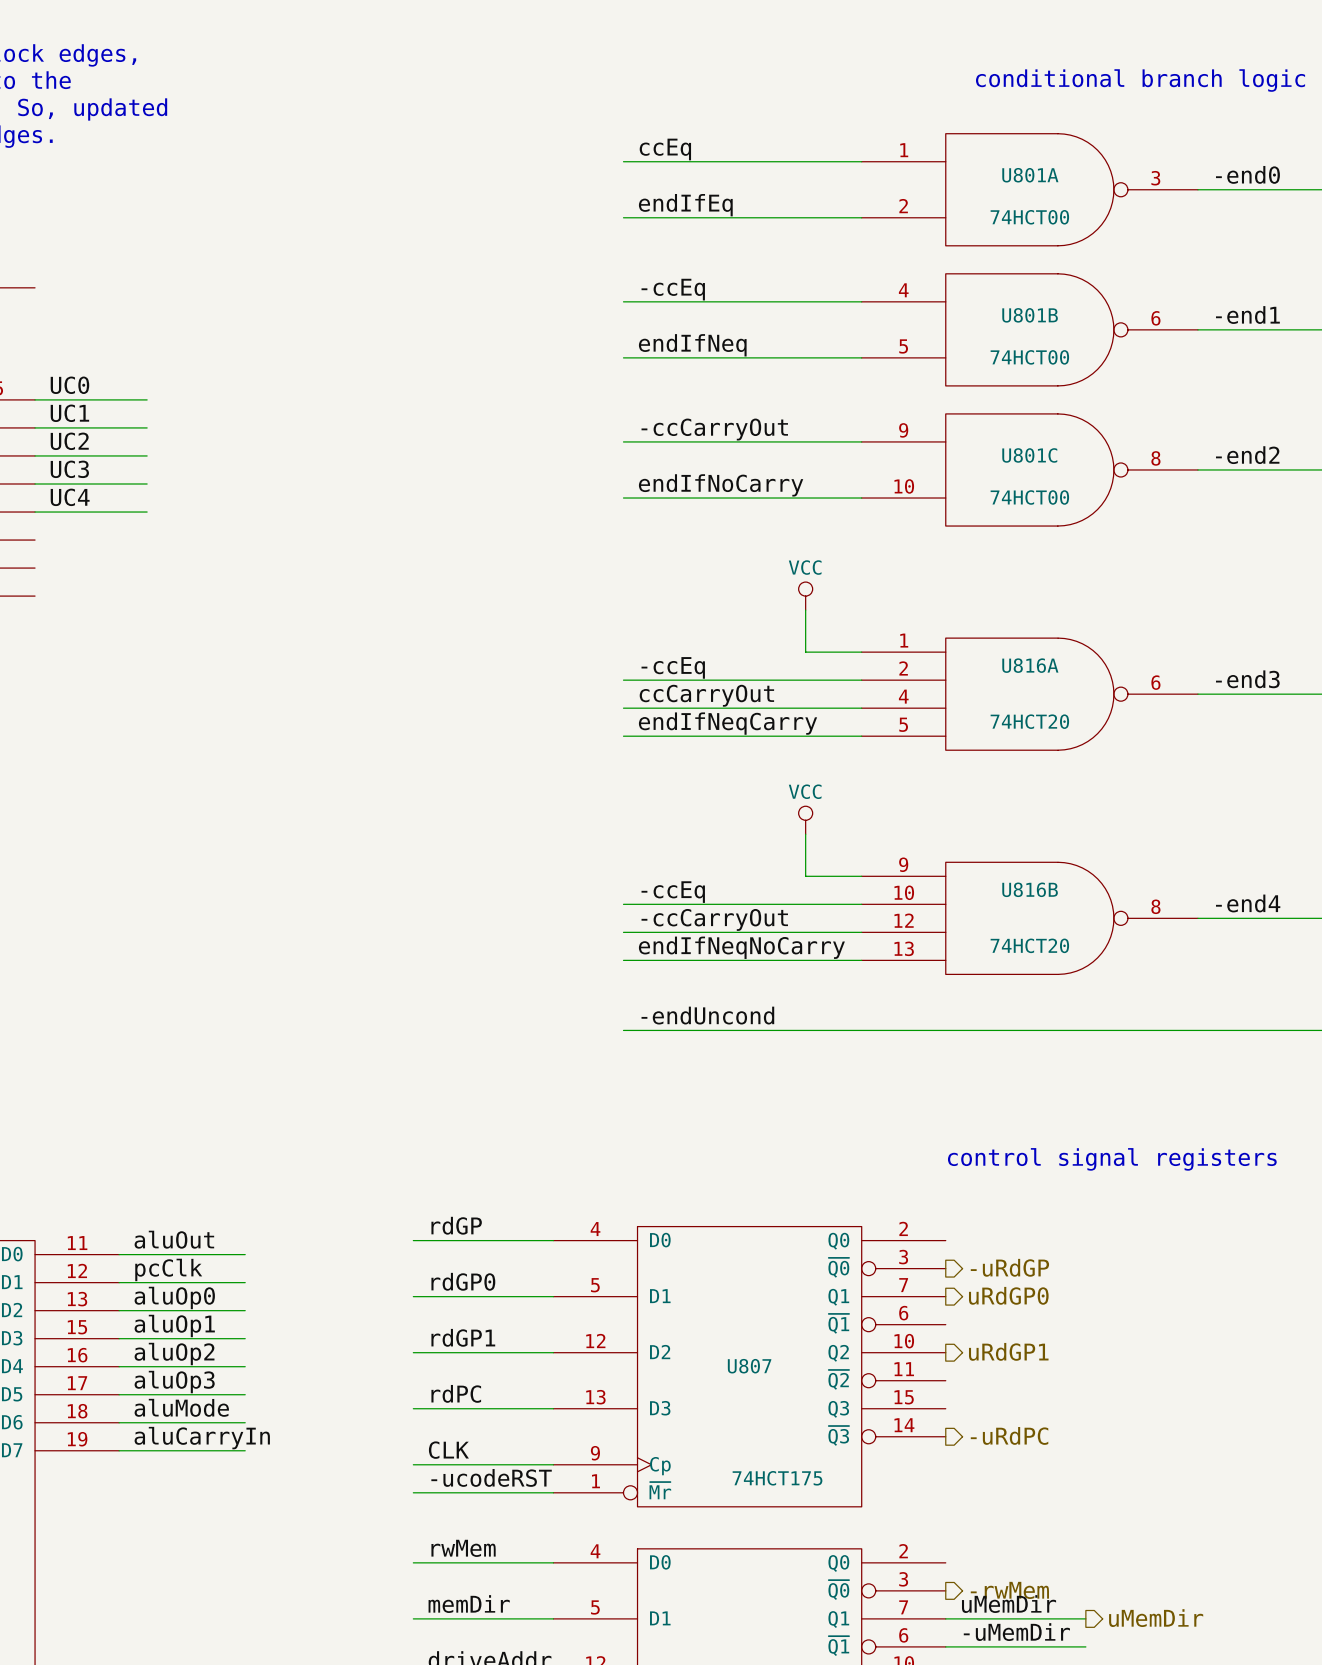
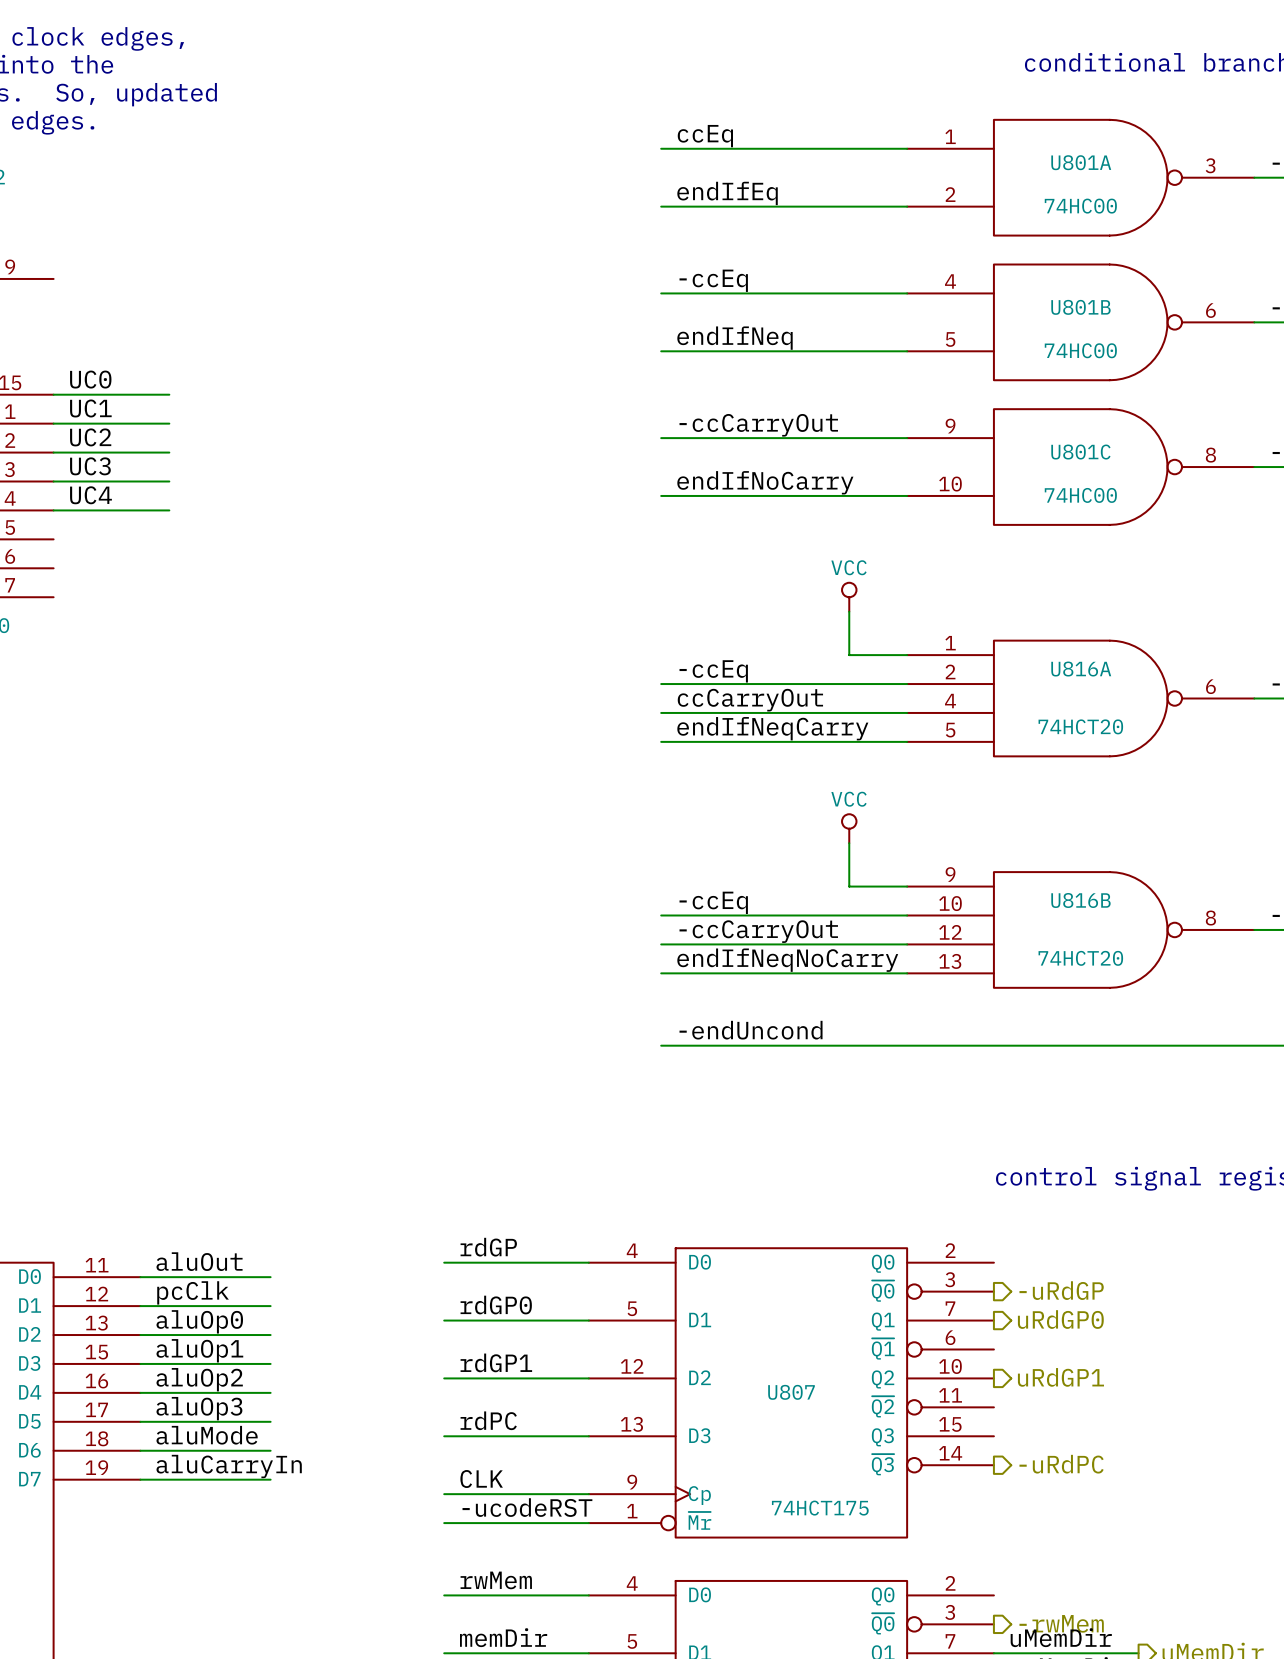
U801A value: 74HCT00 (1029, 217) -> 74HC00 (1080, 206)
U801B value: 74HCT00 (1029, 357) -> 74HC00 (1080, 350)
U801C value: 74HCT00 (1029, 497) -> 74HC00 (1080, 495)

